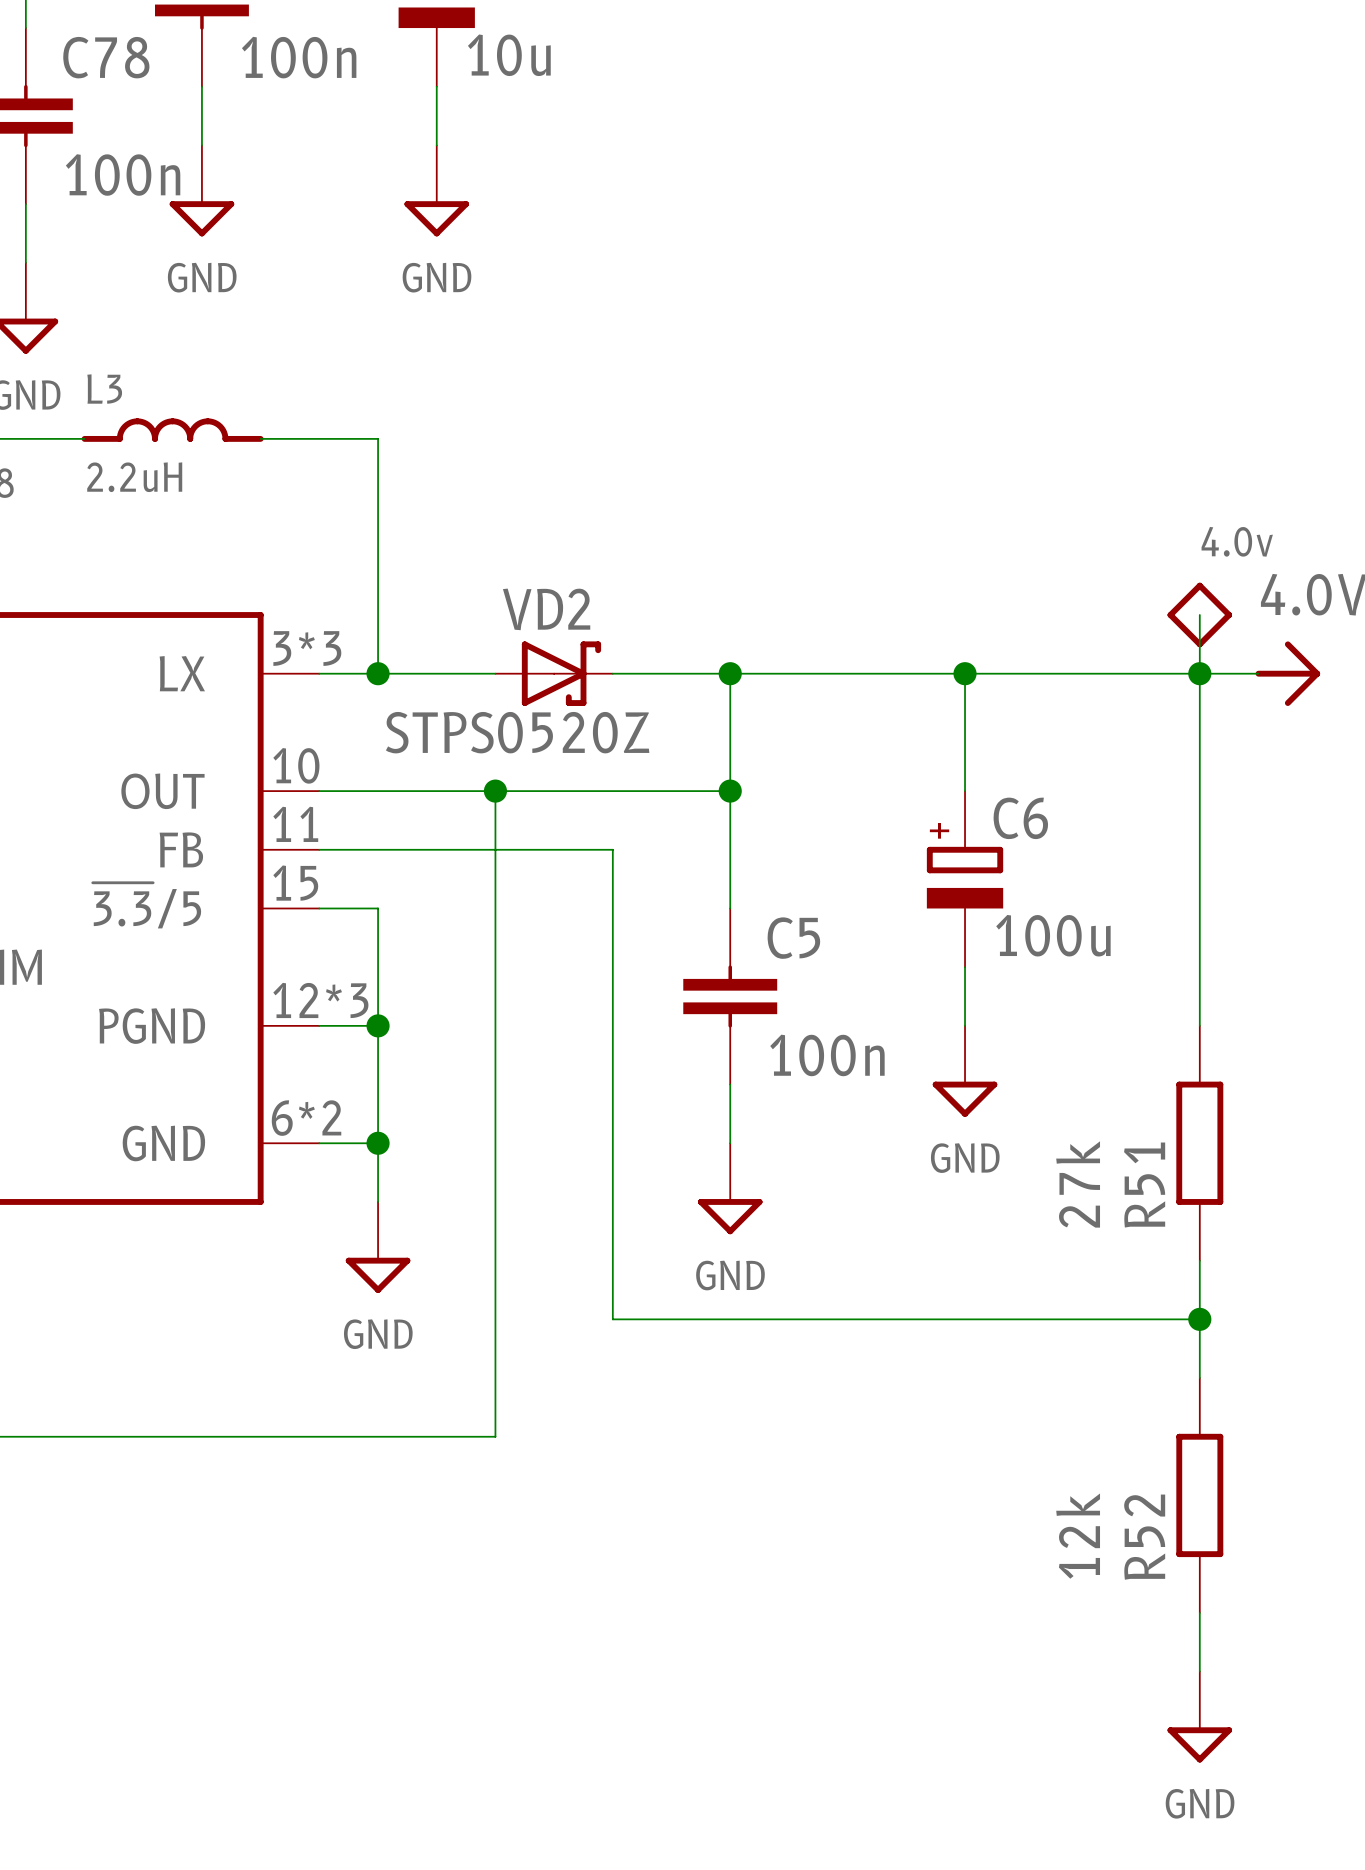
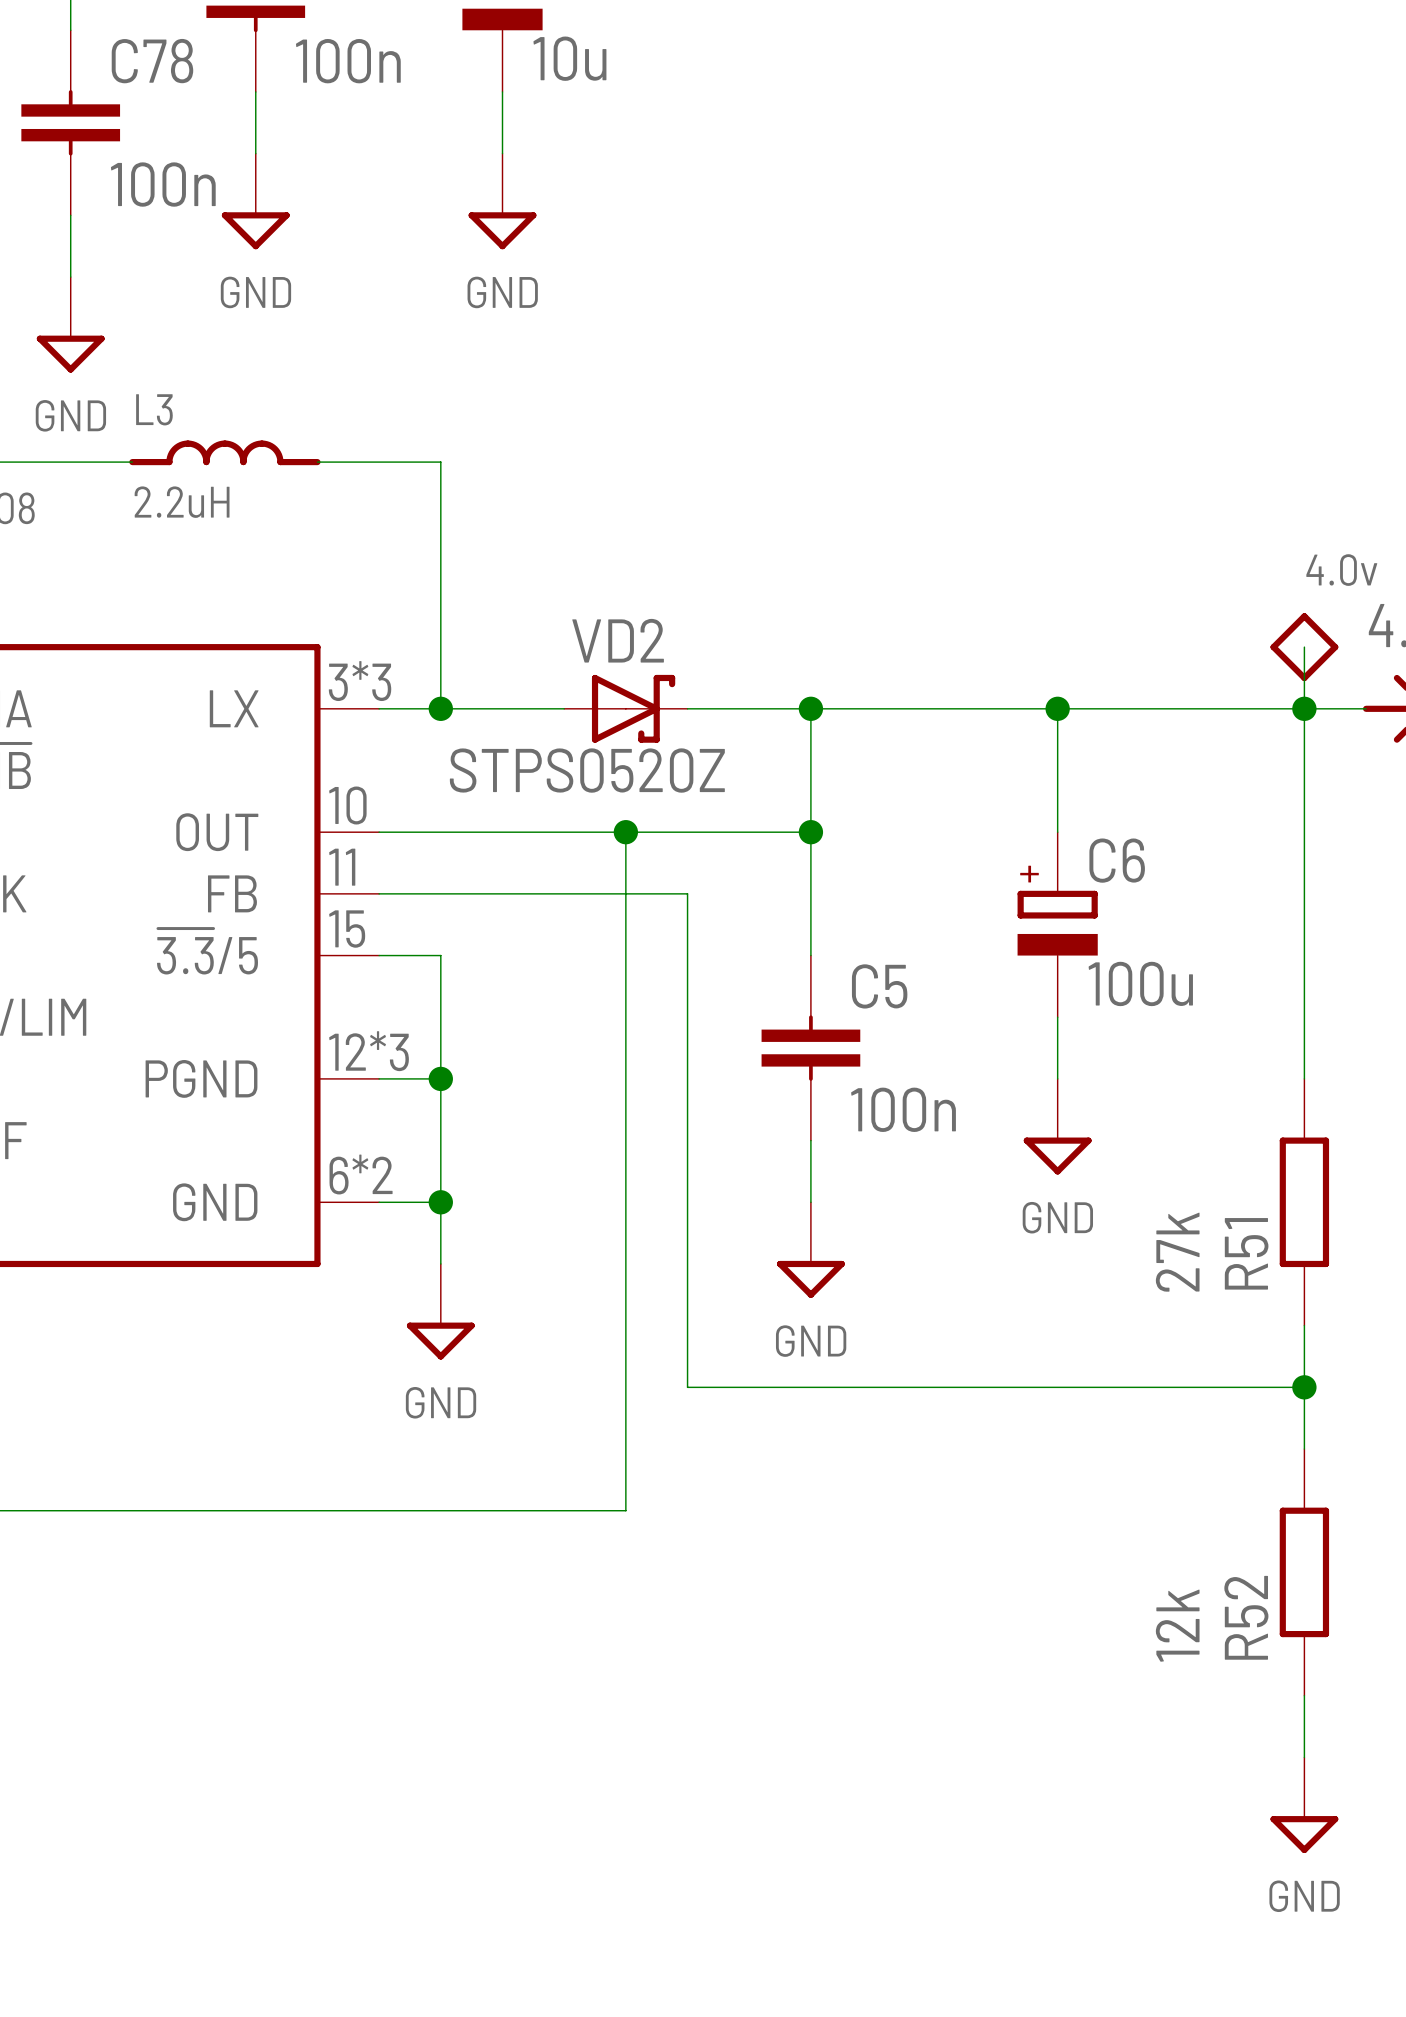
wire: (495, 791) (495, 1436) -> (625, 832) (625, 1510) (564, 1510)
junction position: (495, 791) -> (625, 832)

